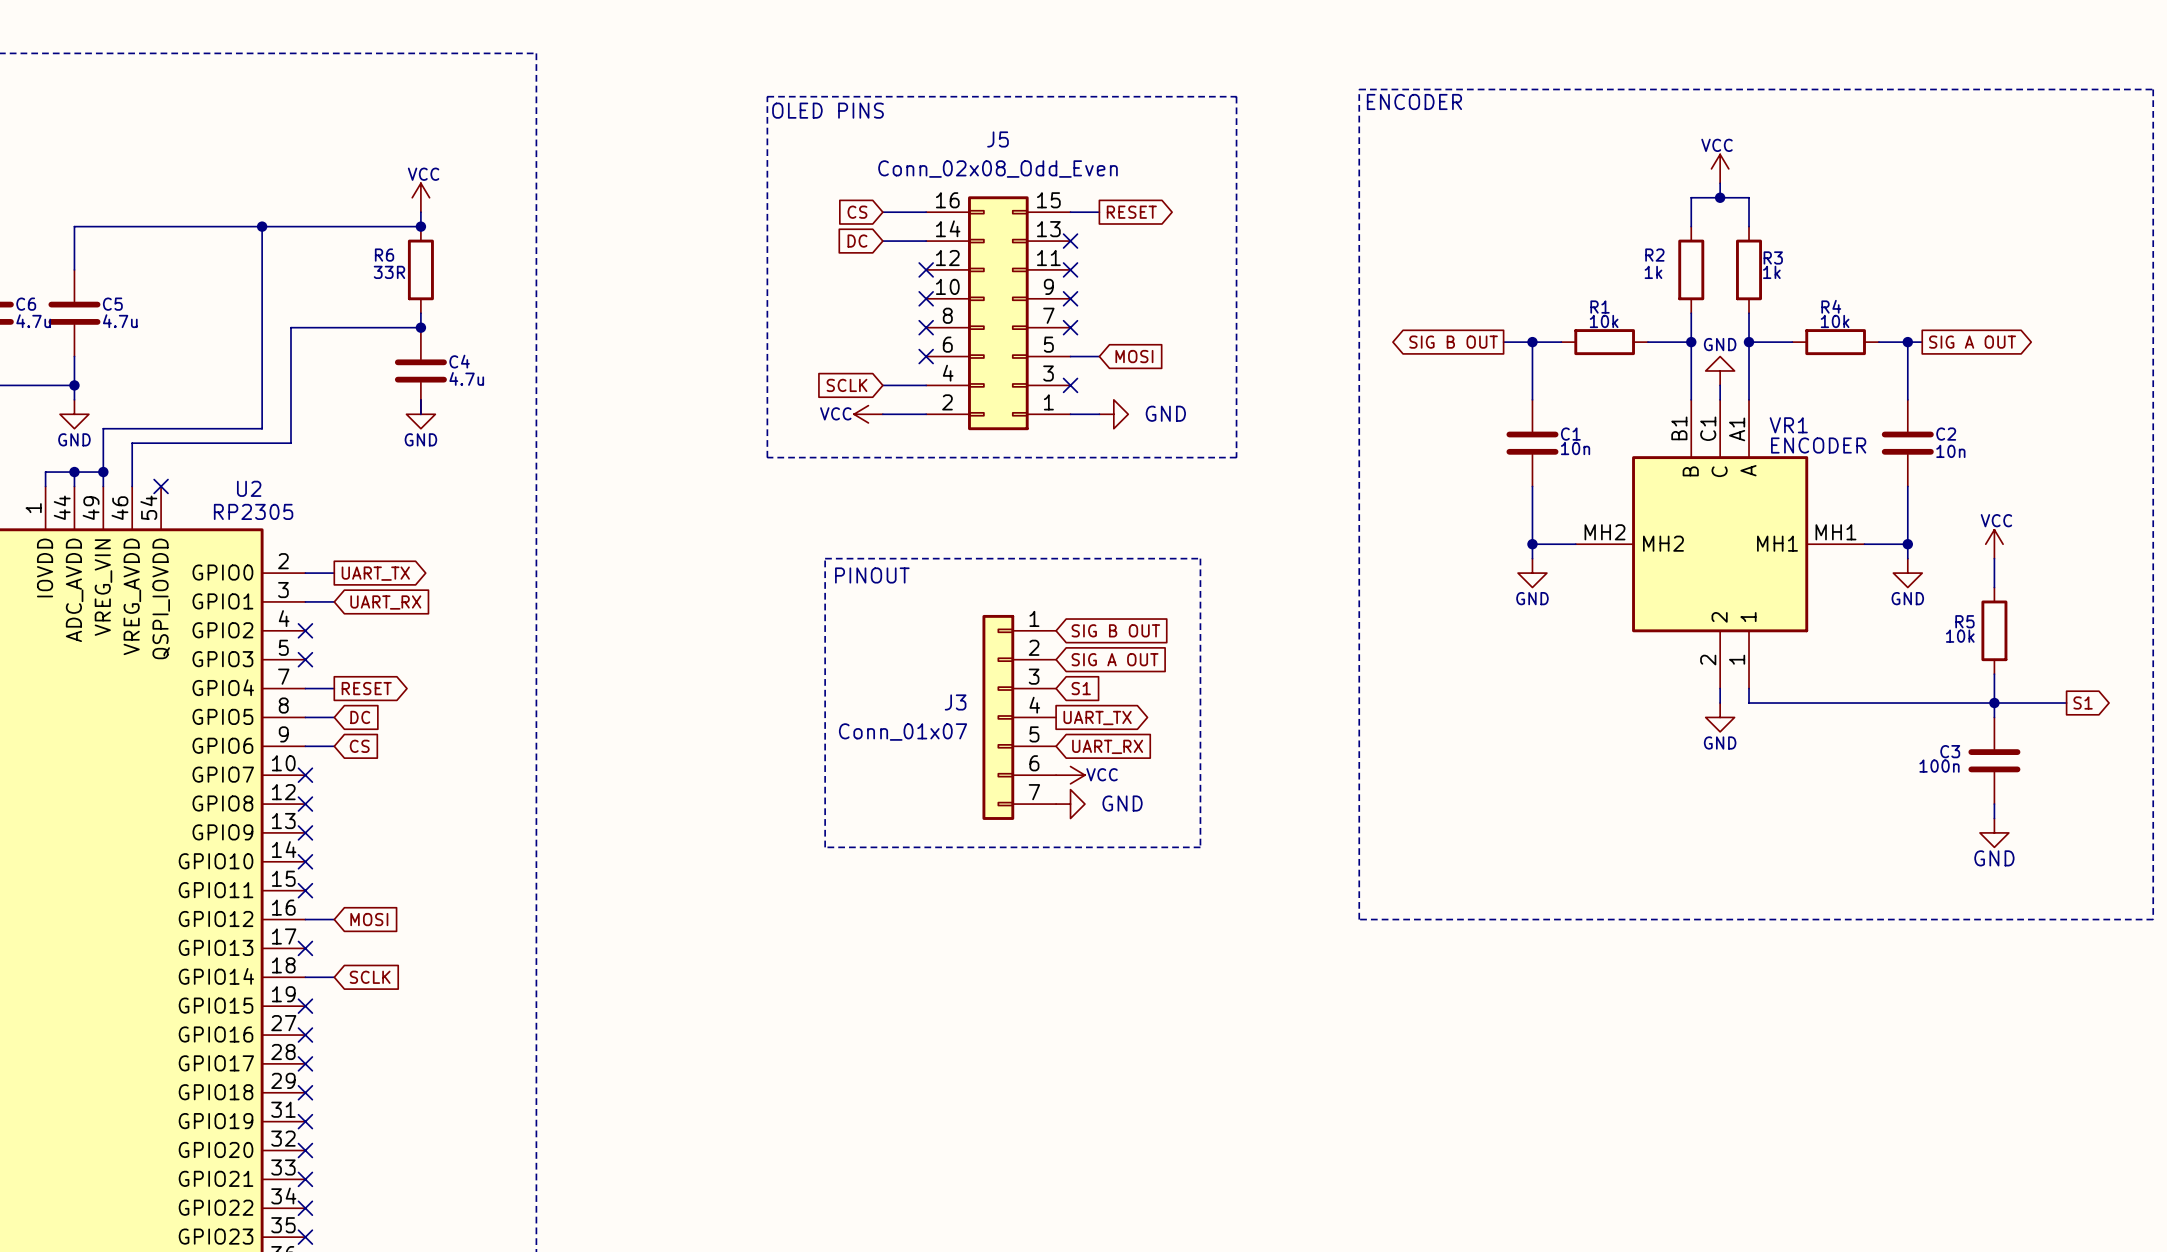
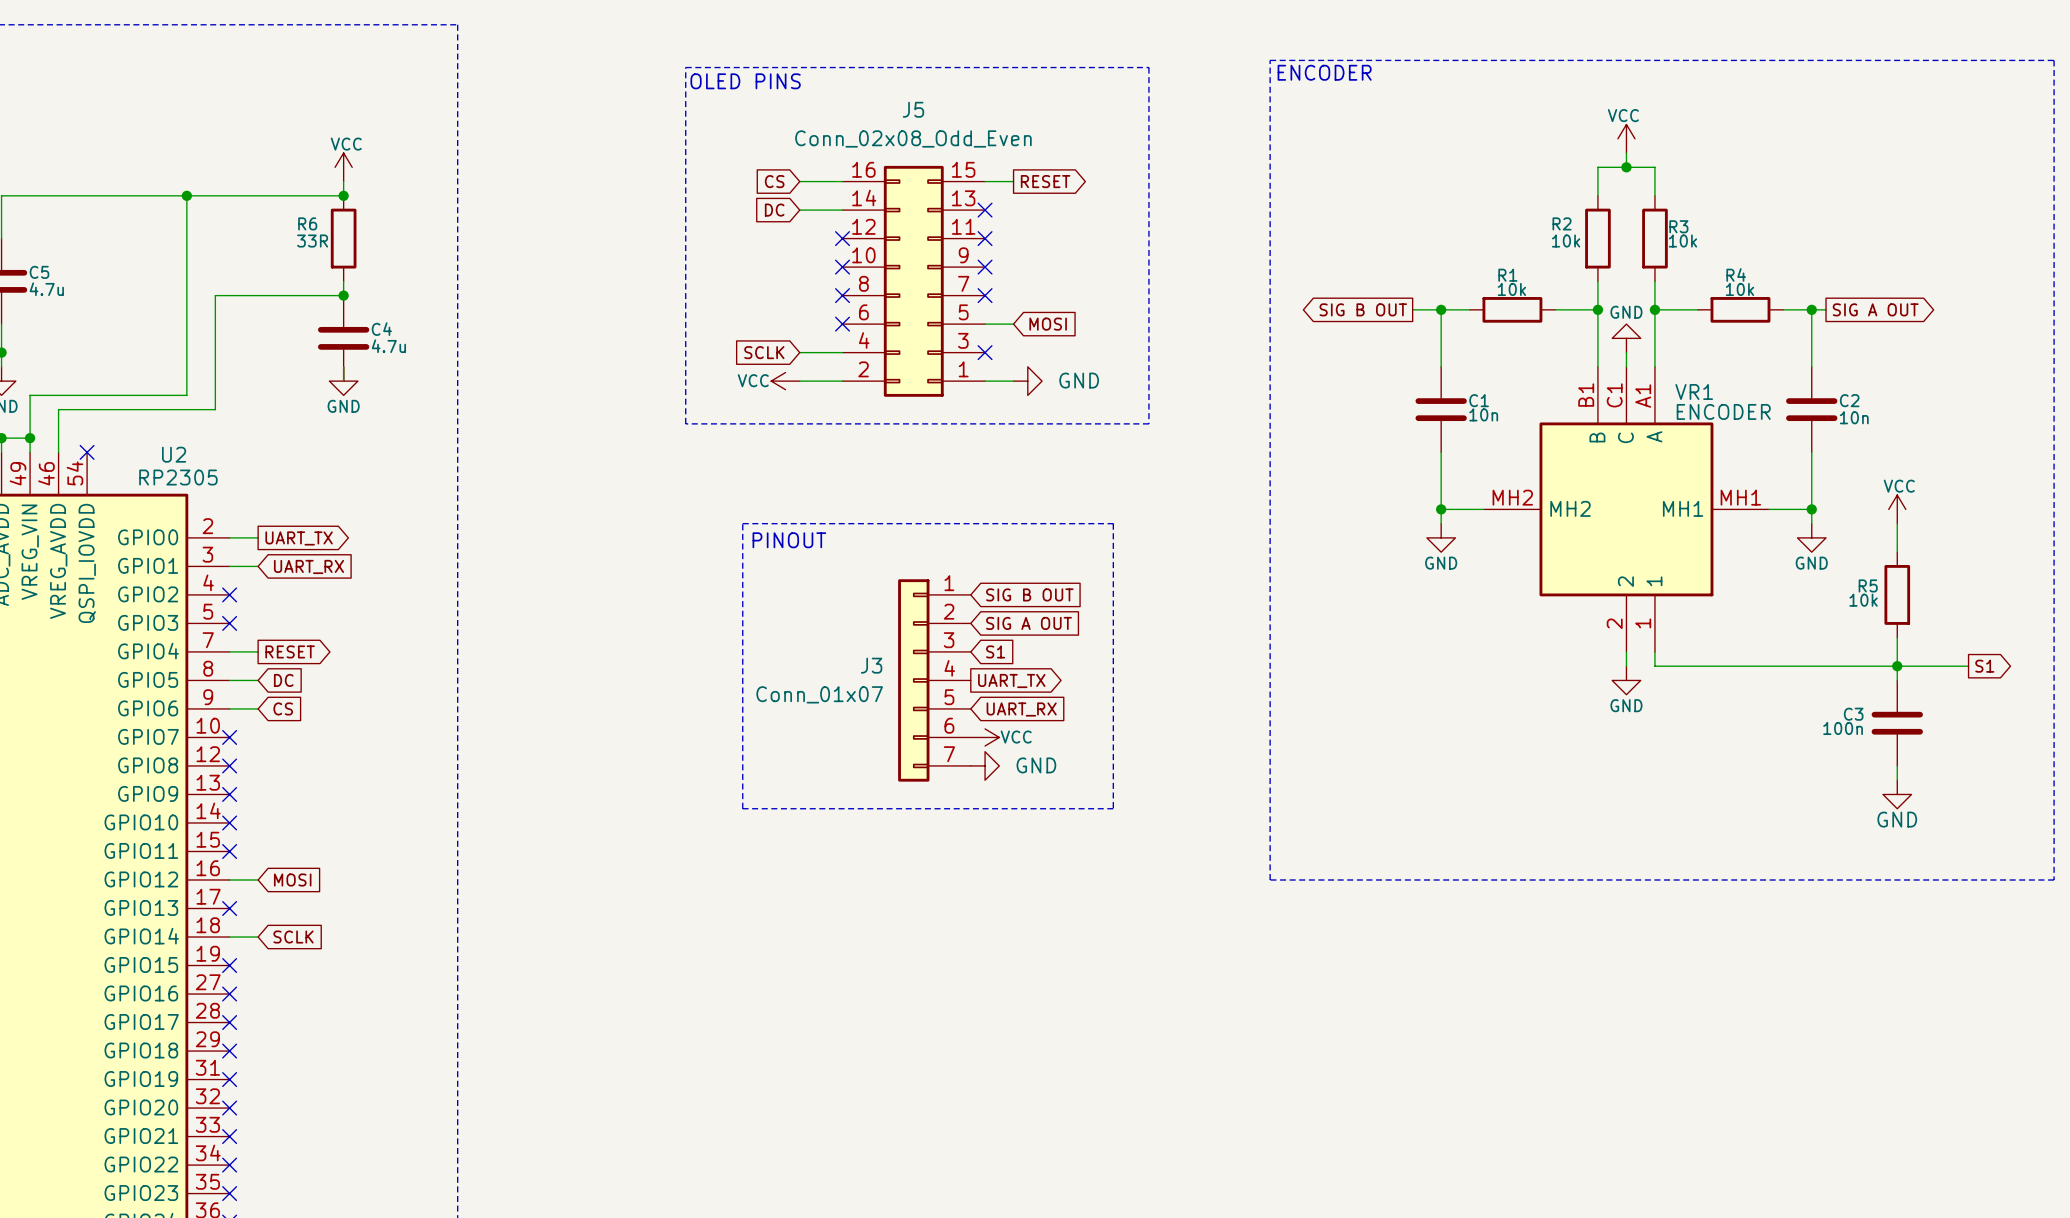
R2 value: 1k (1653, 272) -> 10k (1566, 241)
R3 value: 1k (1771, 272) -> 10k (1682, 241)

